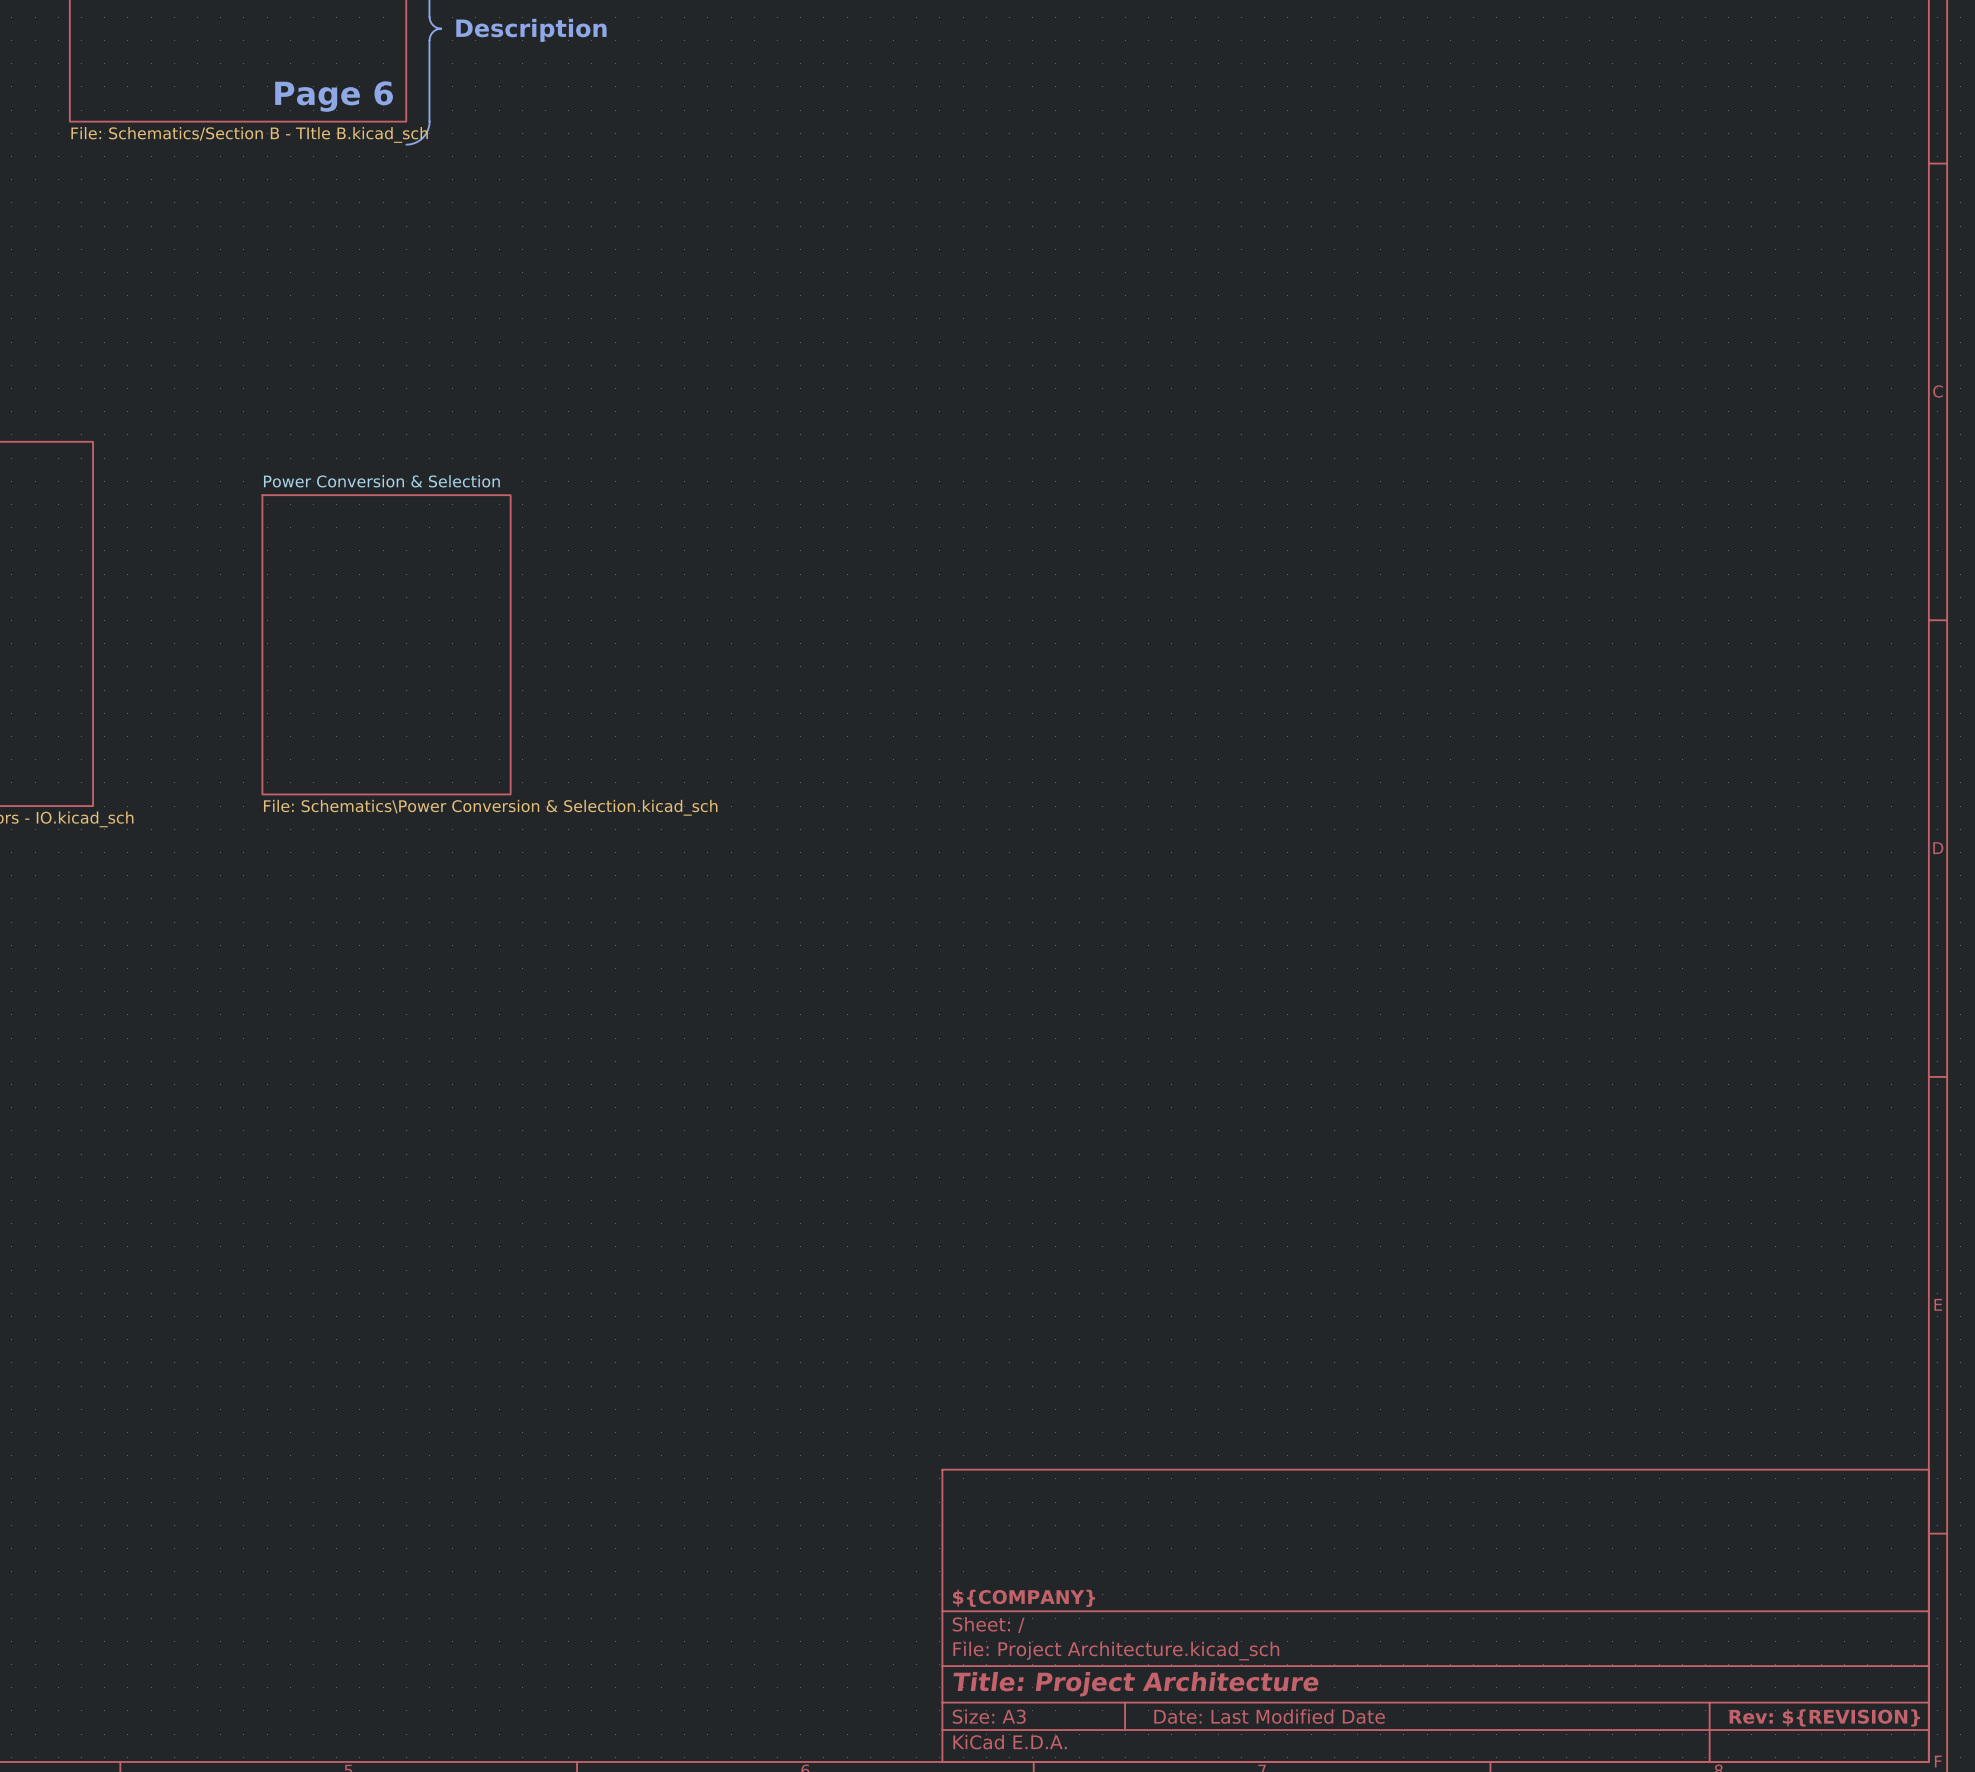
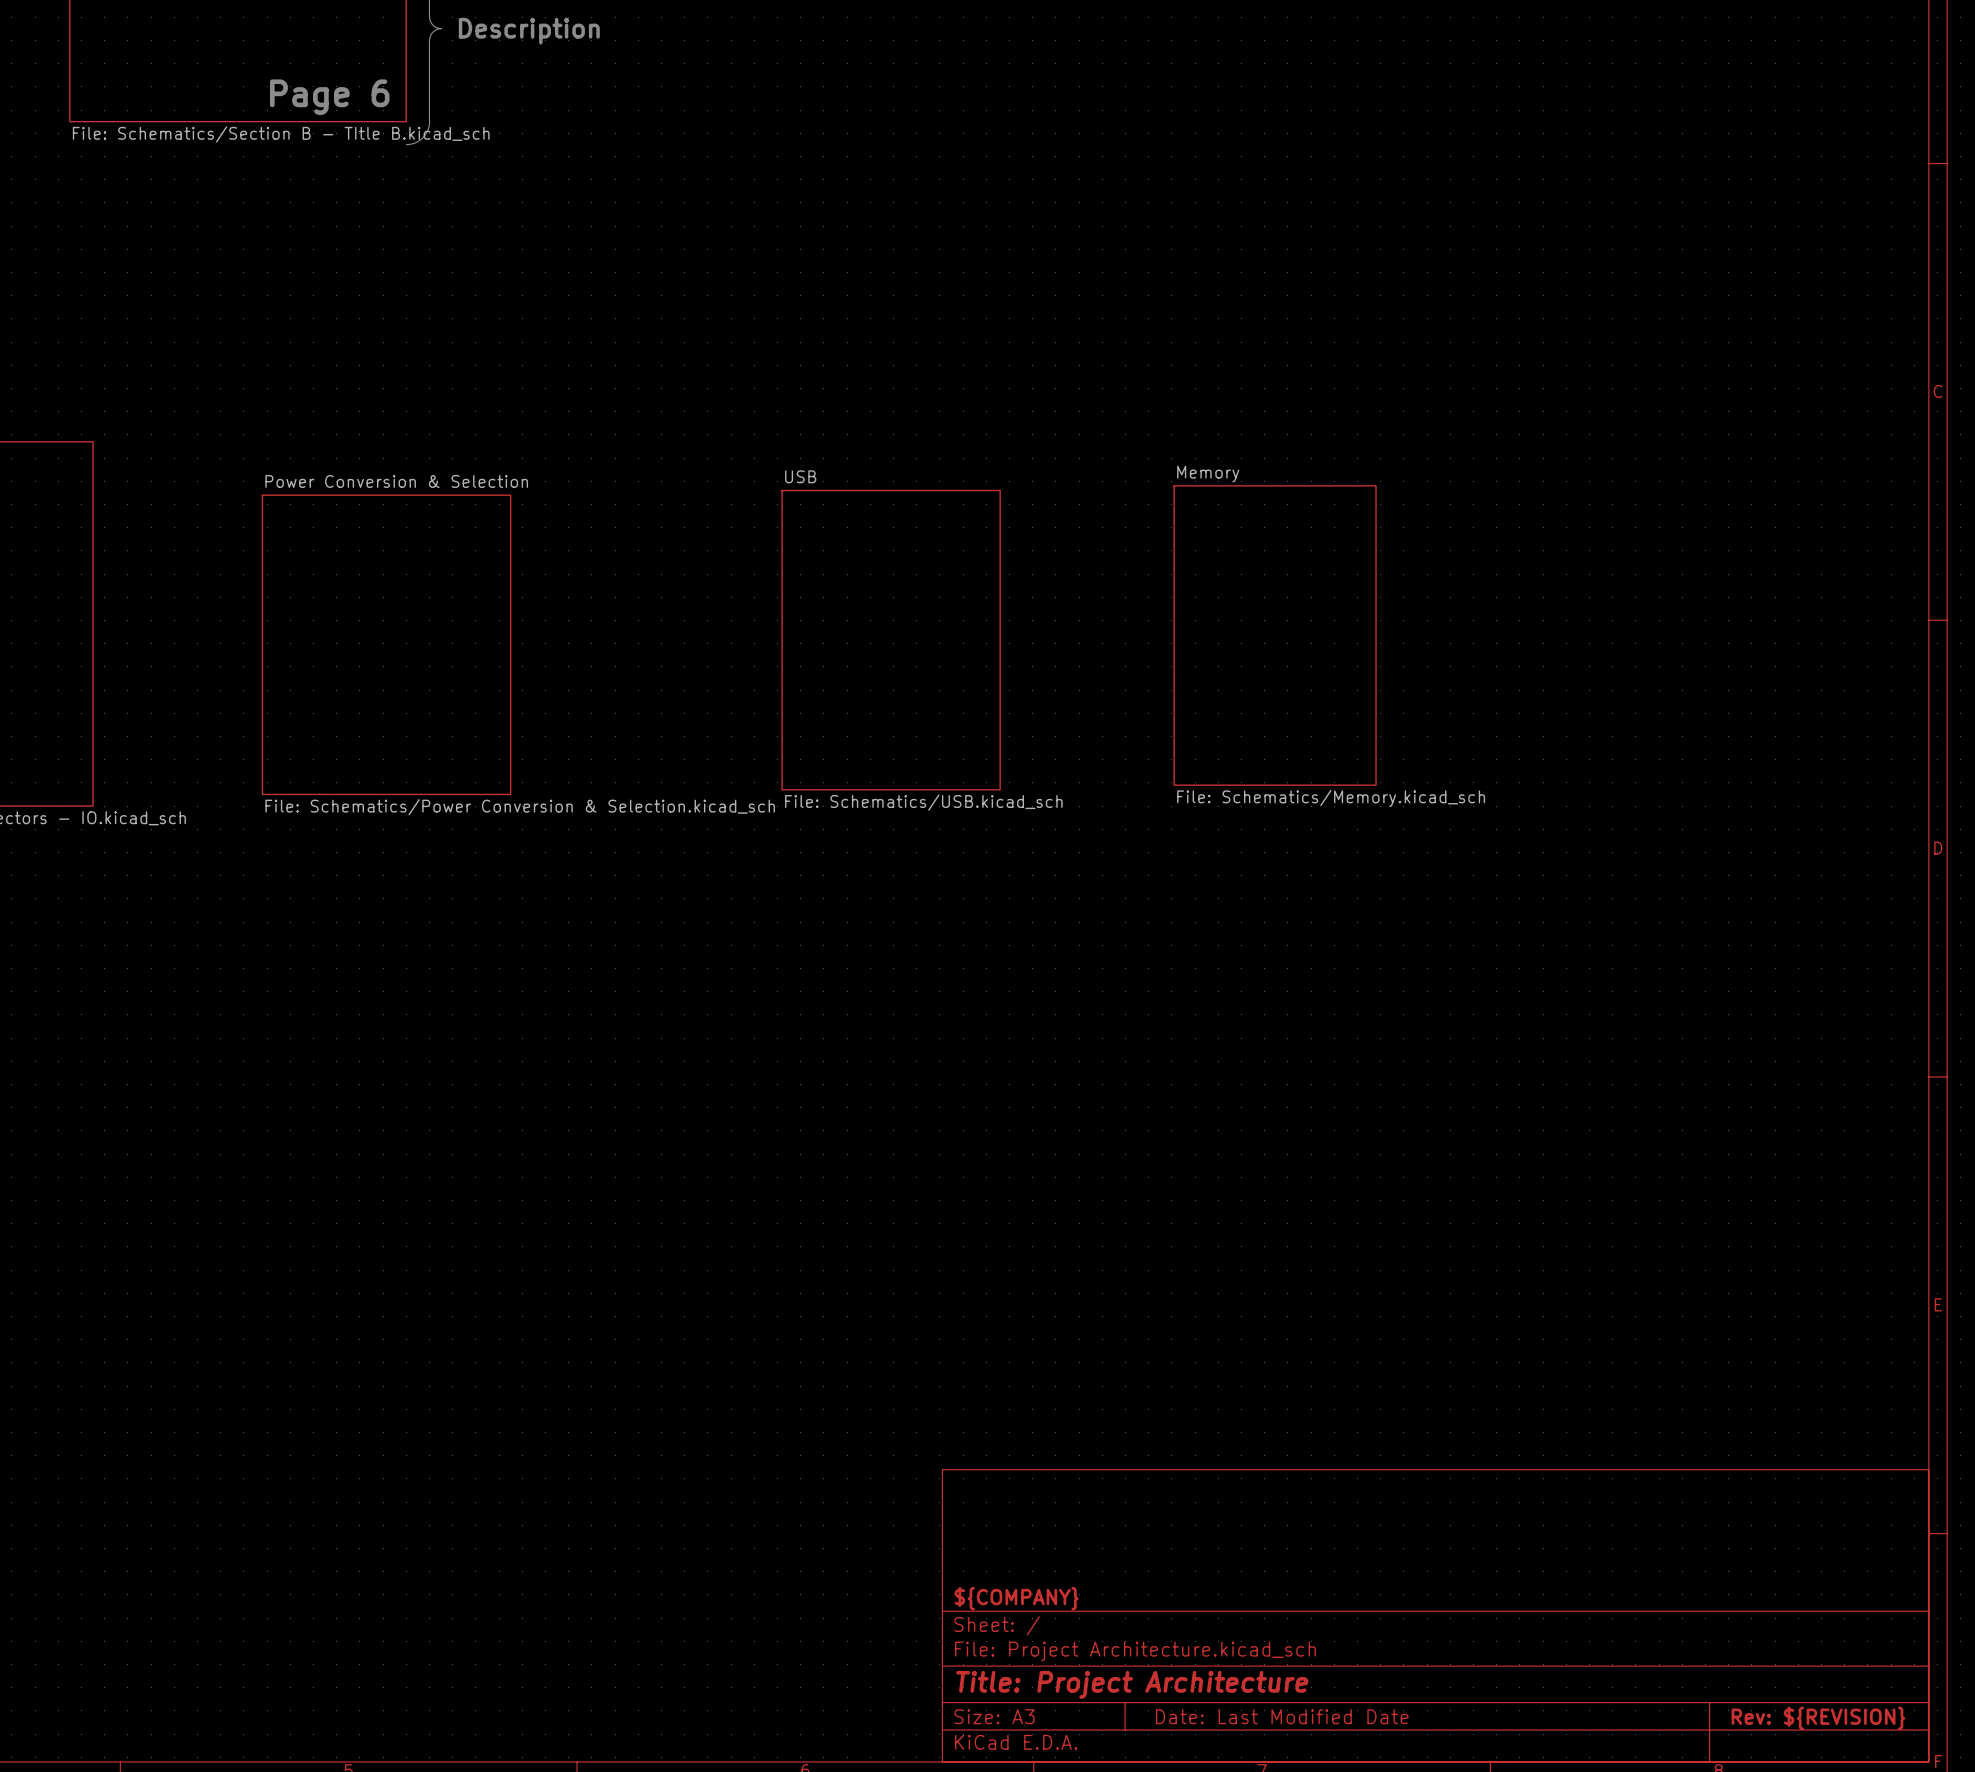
sheet Memory: none -> File: Schematics/Memory.kicad_sch (1275, 635)
sheet USB: none -> File: Schematics/USB.kicad_sch (891, 640)
sheet Power Conversion & Selection value: File: Schematics\Power Conversion & Selection.kicad_sch (490, 807) -> File: Schematics/Power Conversion & Selection.kicad_sch (520, 807)

